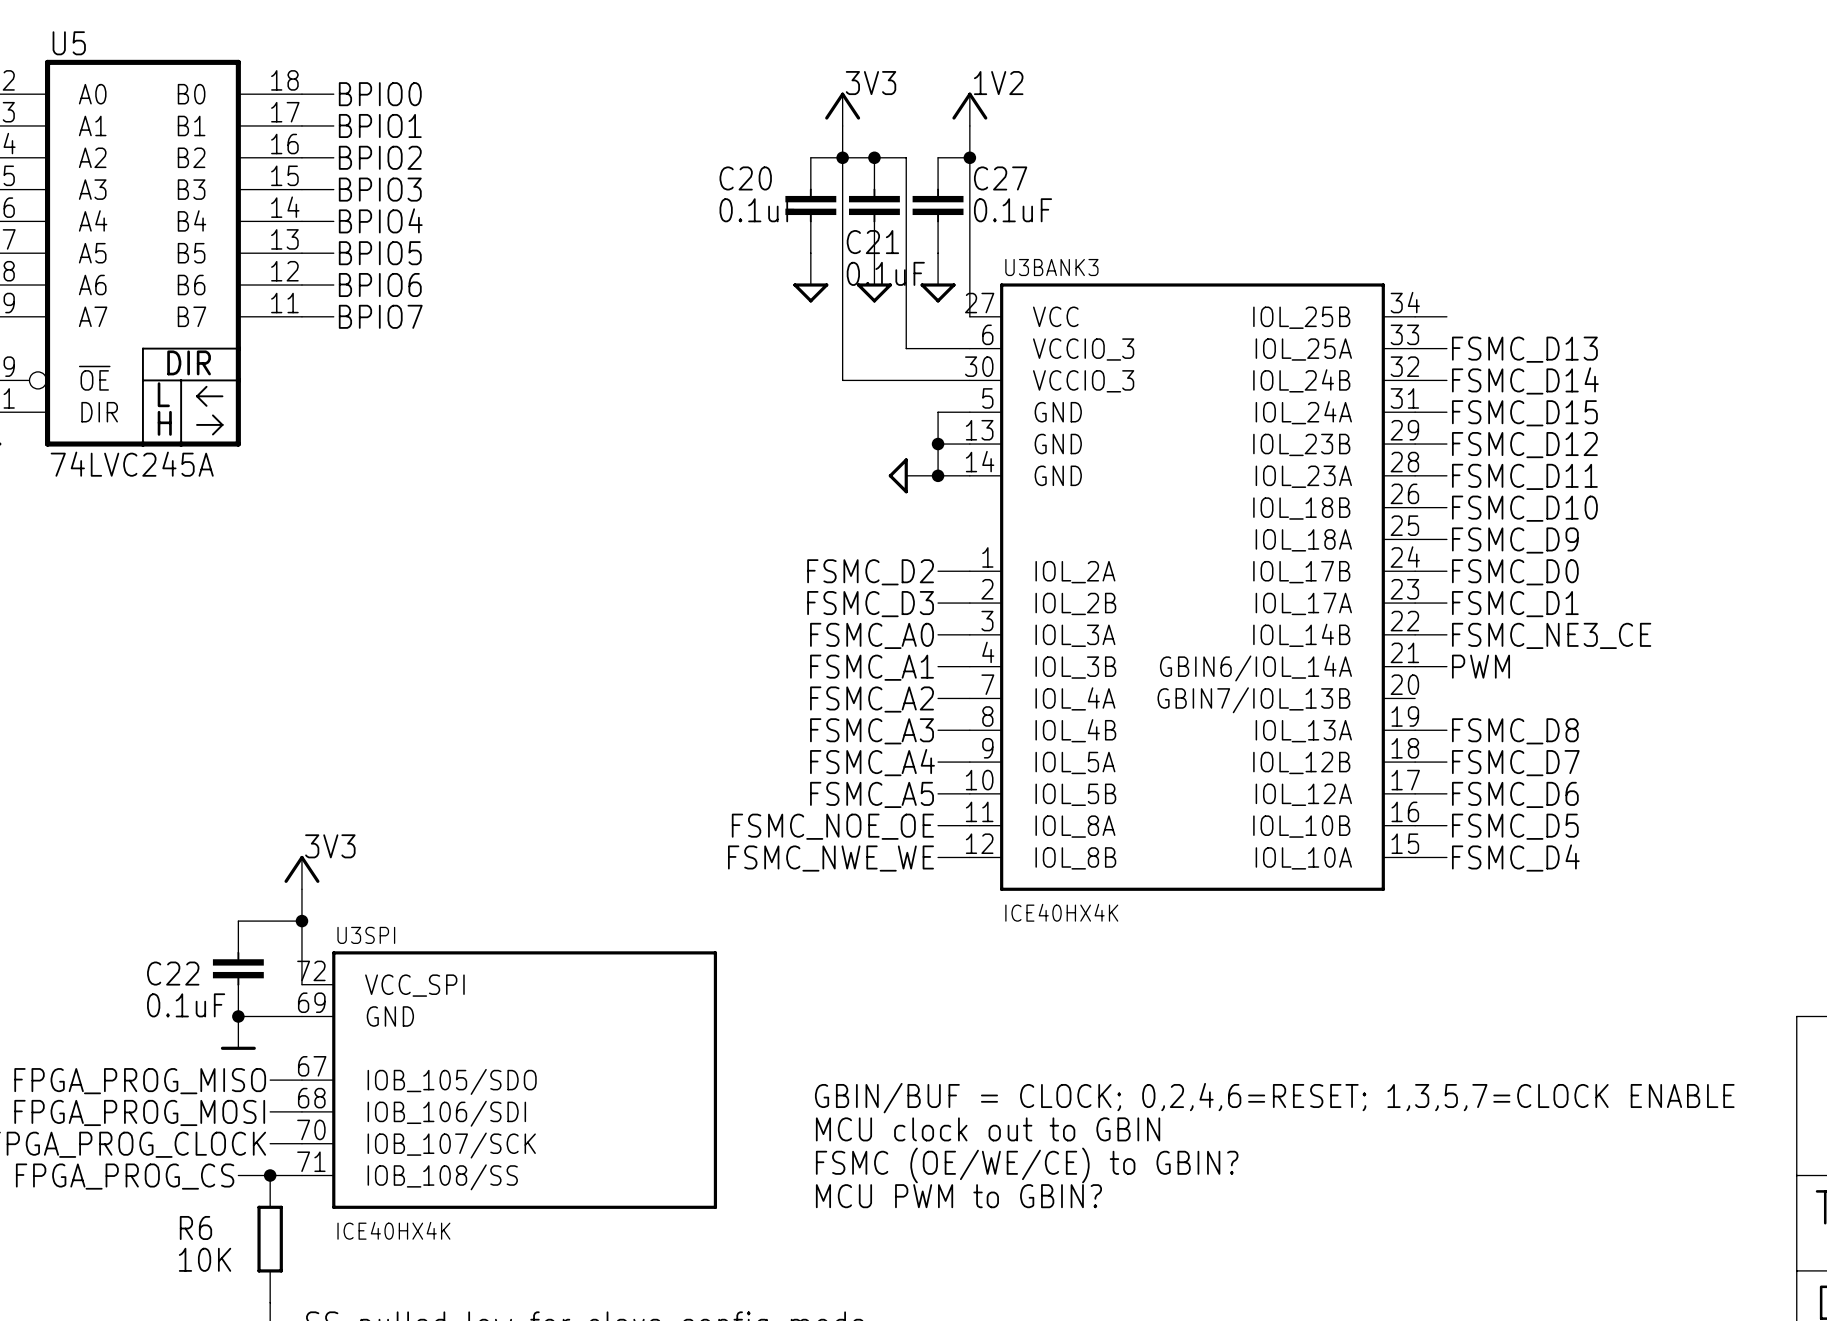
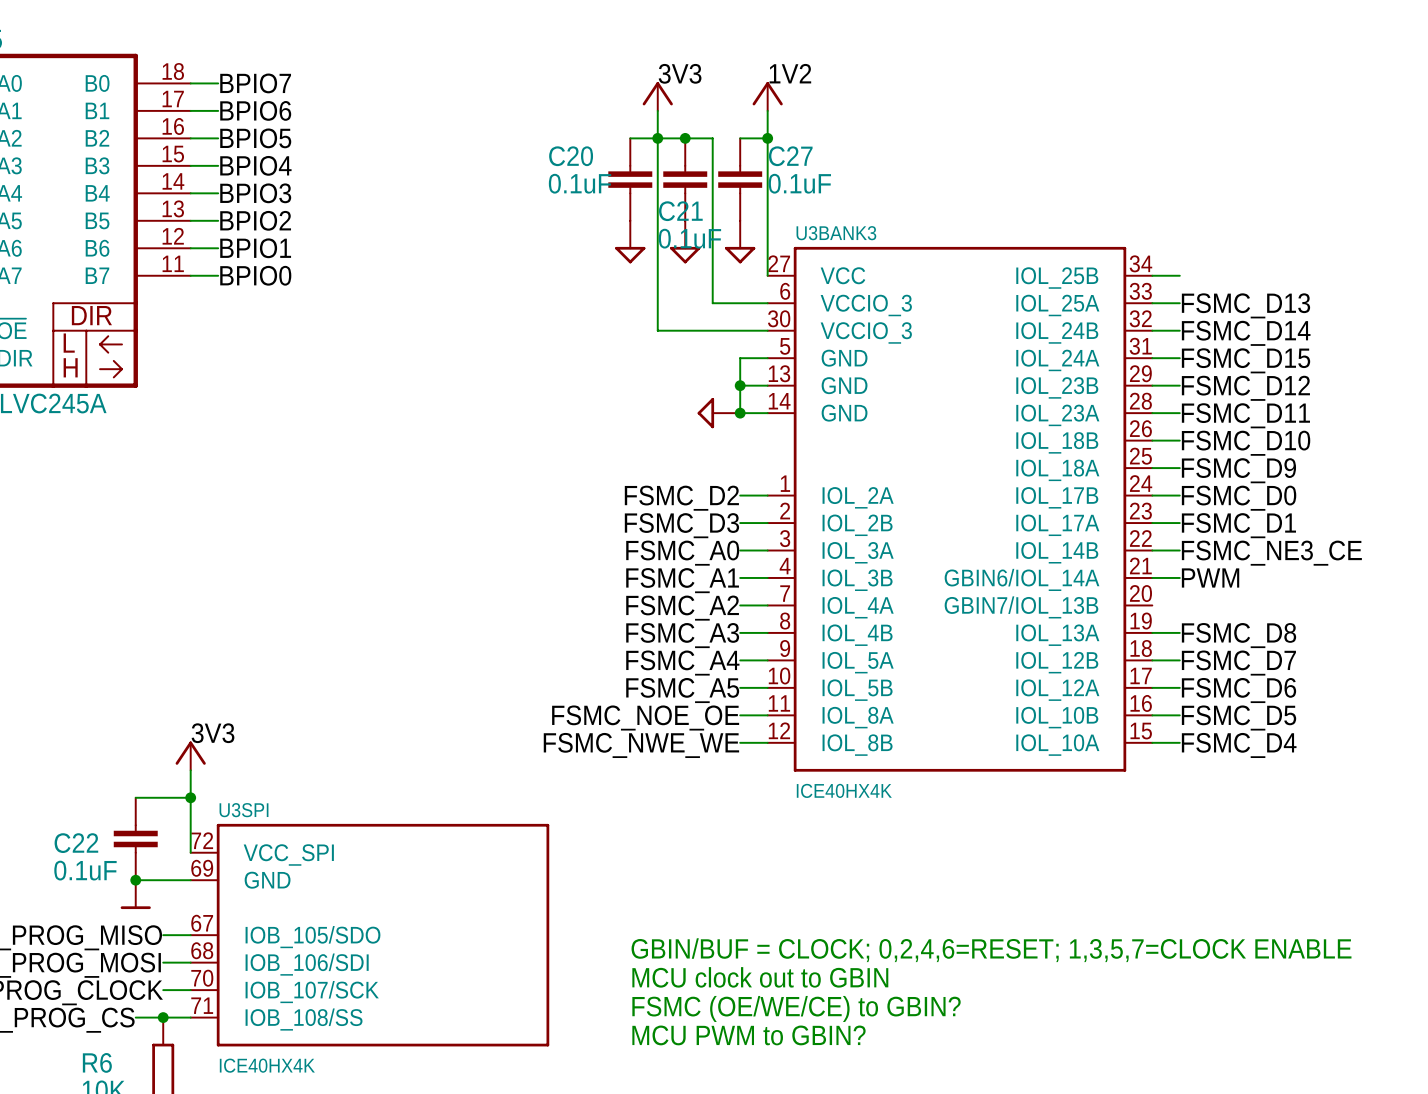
label: BPIO0 (380, 94) -> BPIO7 (255, 83)
label: BPIO1 (380, 125) -> BPIO6 (255, 110)
label: BPIO2 (380, 157) -> BPIO5 (255, 138)
label: BPIO3 (380, 189) -> BPIO4 (255, 165)
label: BPIO4 (380, 220) -> BPIO3 (255, 193)
label: BPIO5 (380, 253) -> BPIO2 (255, 220)
label: BPIO6 (380, 285) -> BPIO1 (255, 248)
label: BPIO7 (380, 316) -> BPIO0 (255, 275)

